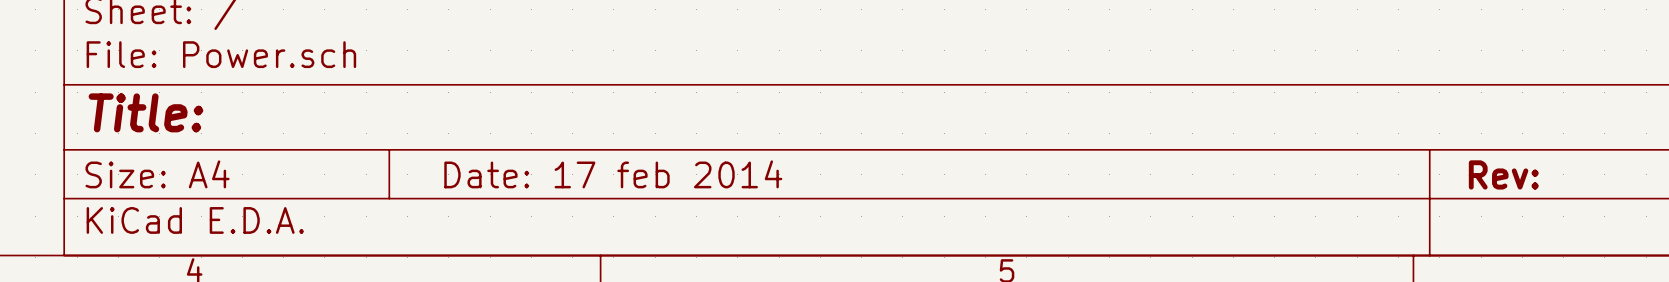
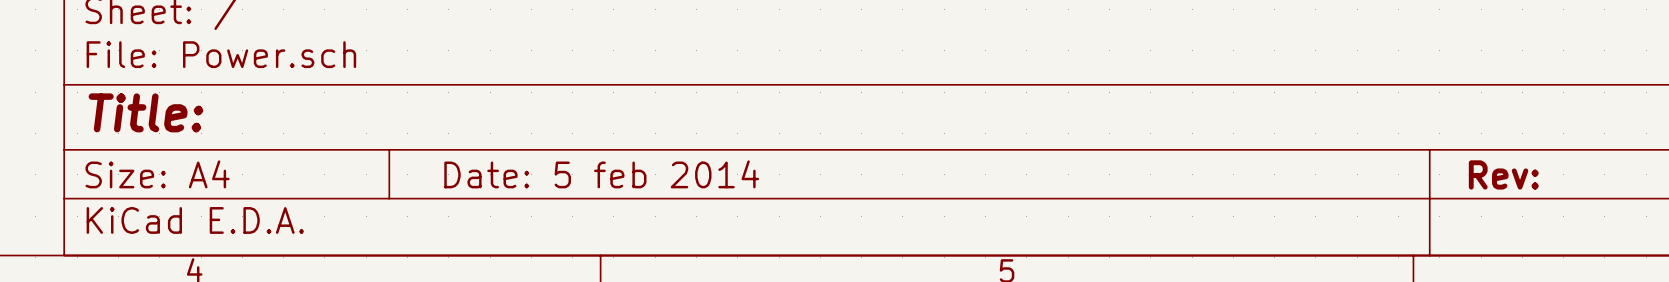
title block: Date: 17 feb 2014 (613, 174) -> Date: 5 feb 2014 (601, 174)

